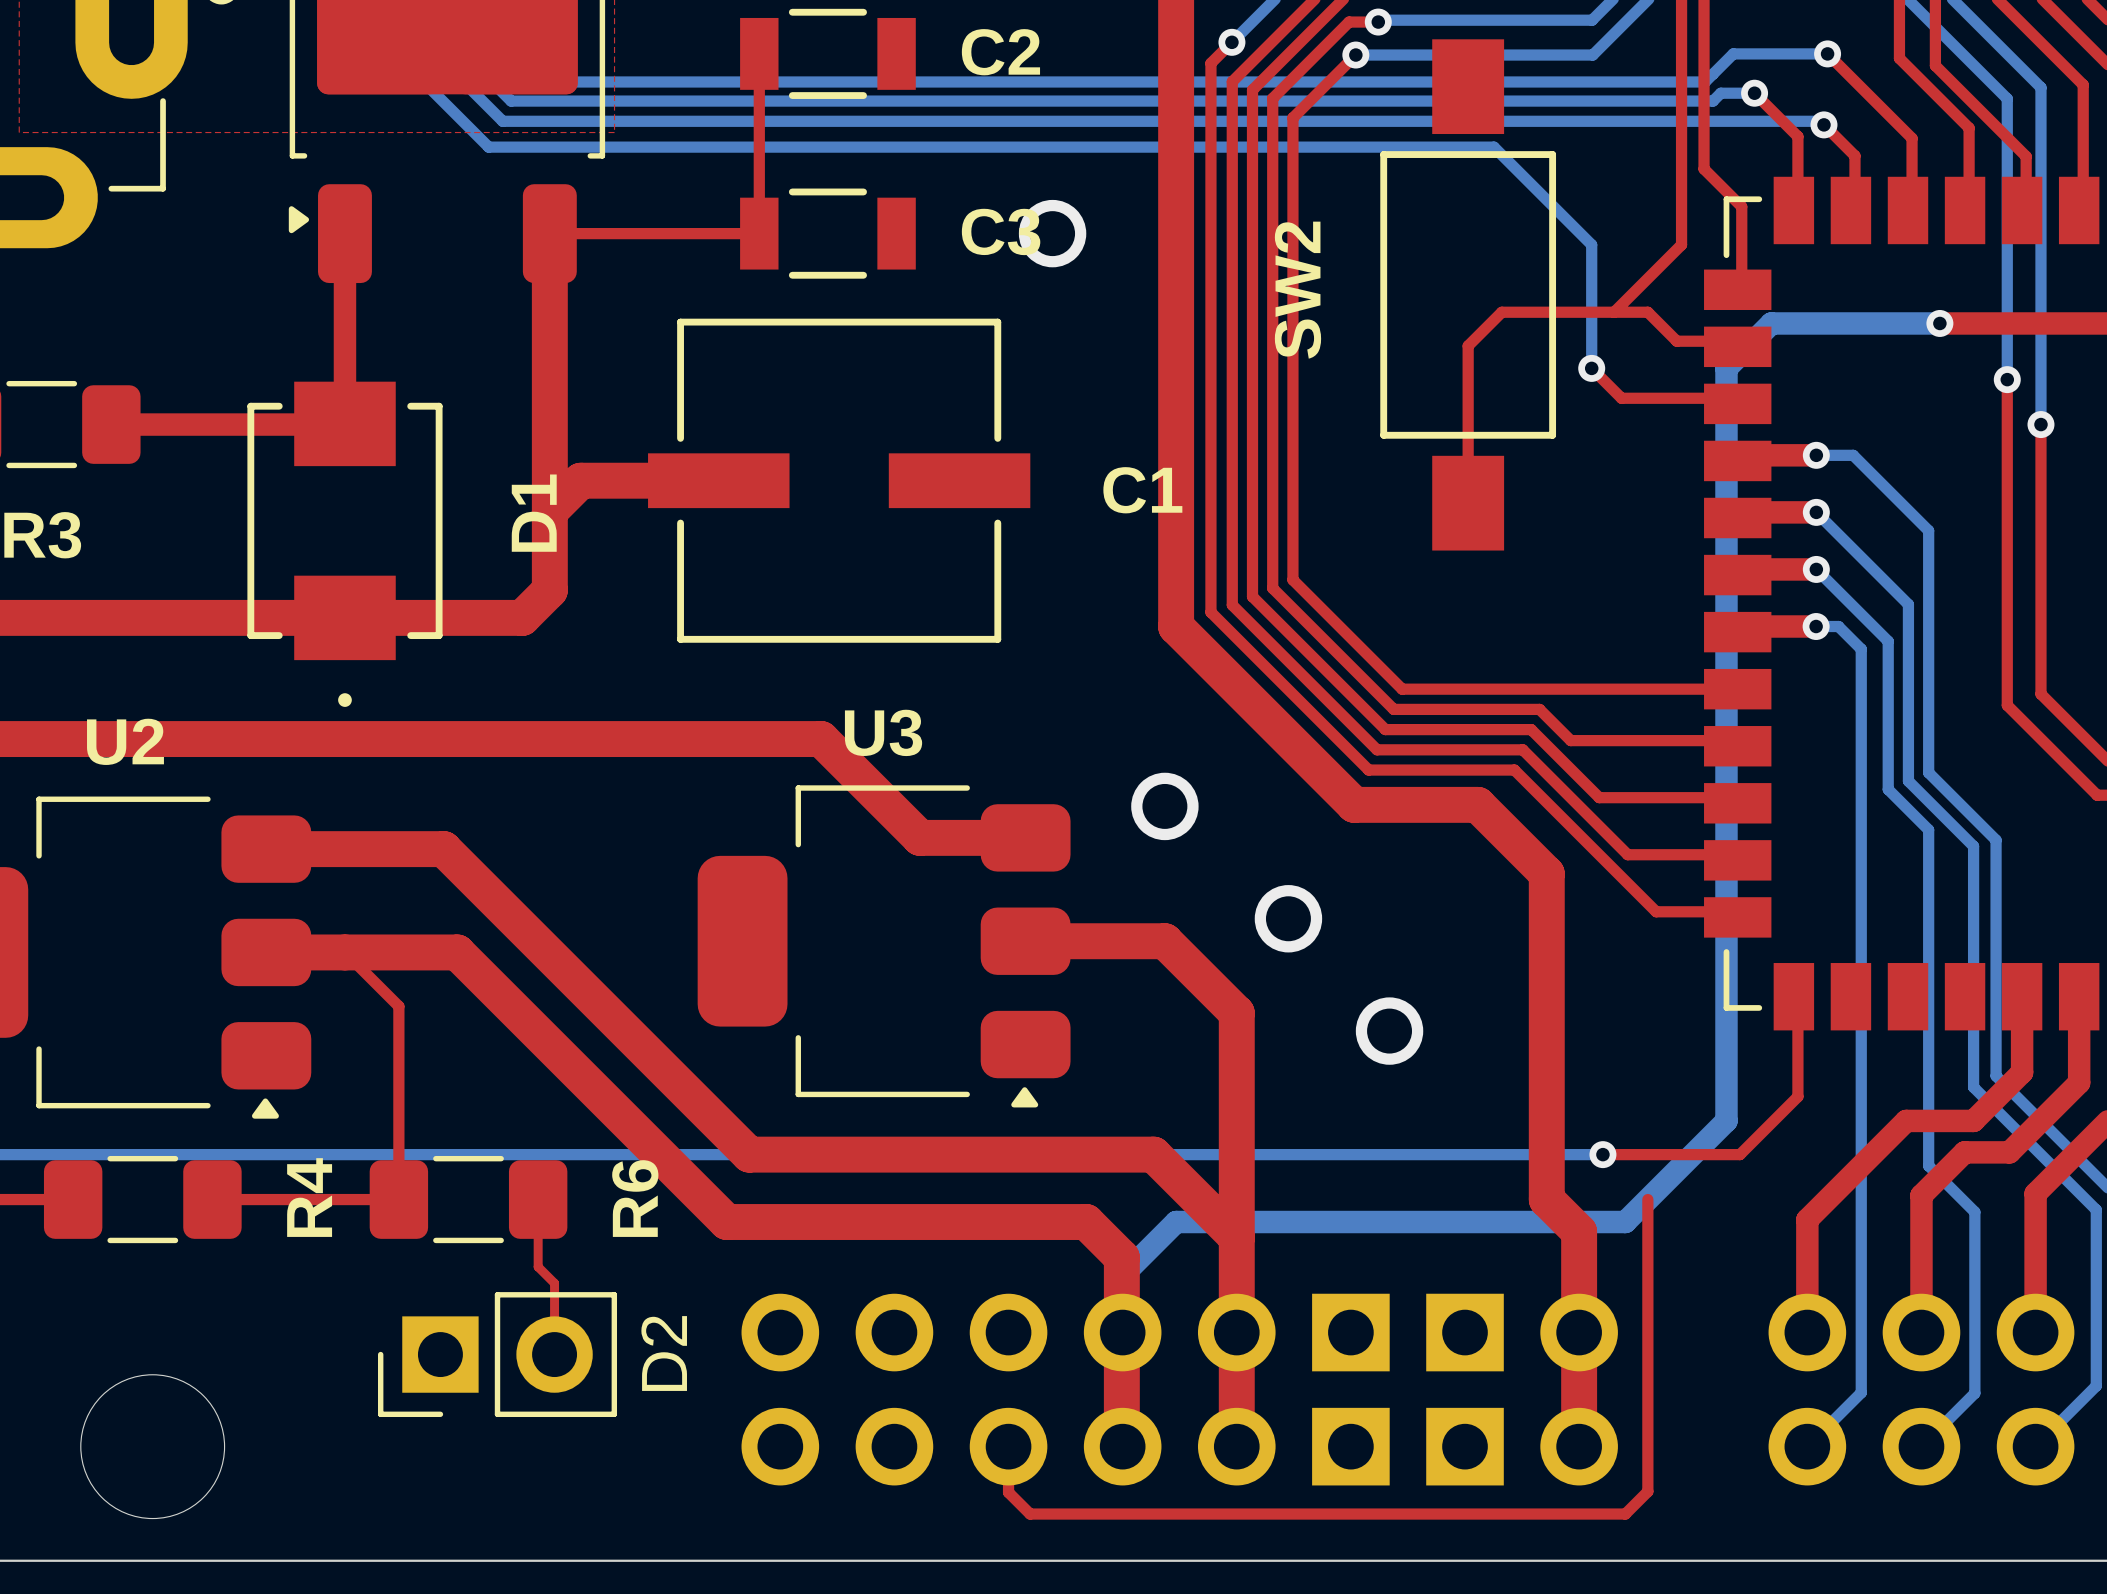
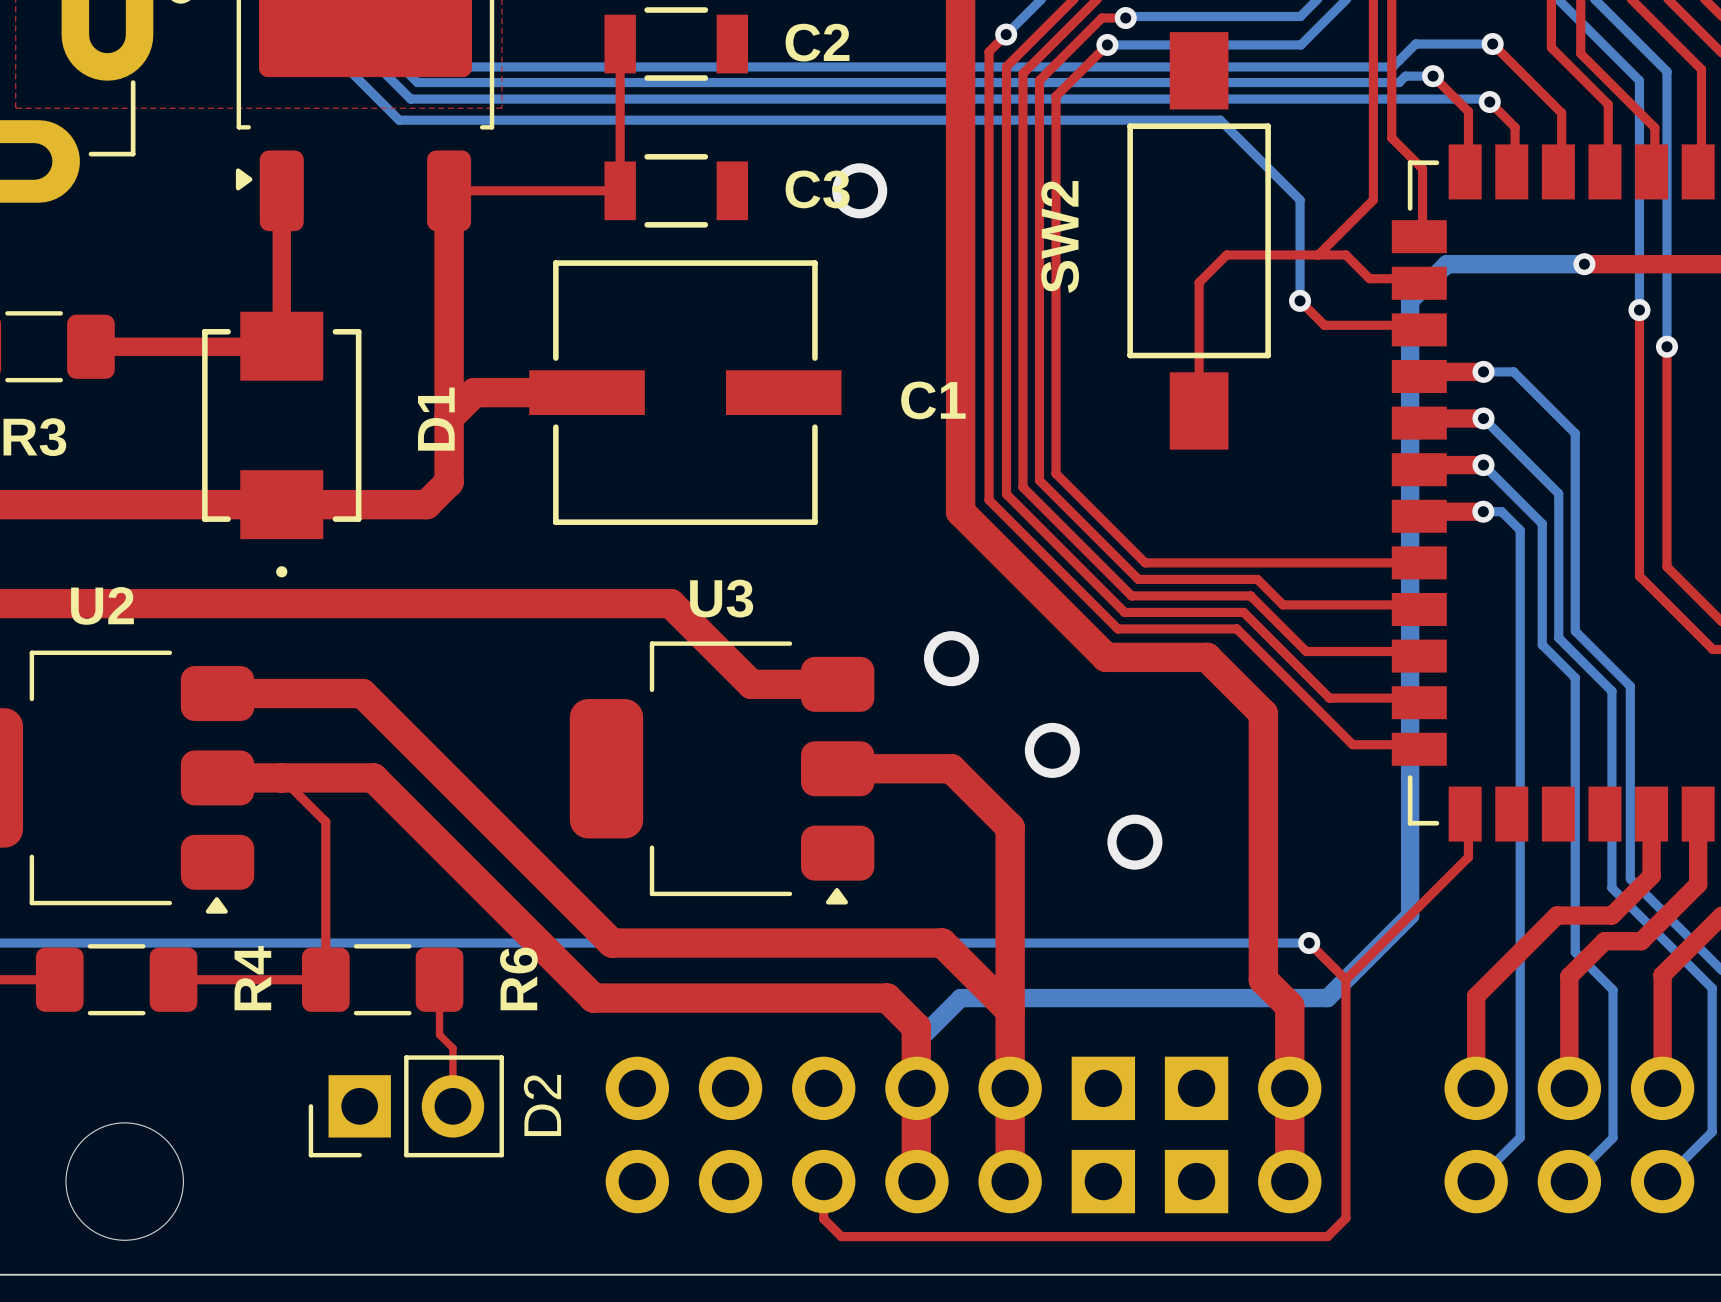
top track: (1797, 1049) (1797, 1096) (1739, 1154) (1602, 1154) -> (1468, 857) (1345, 979) (1309, 943)

